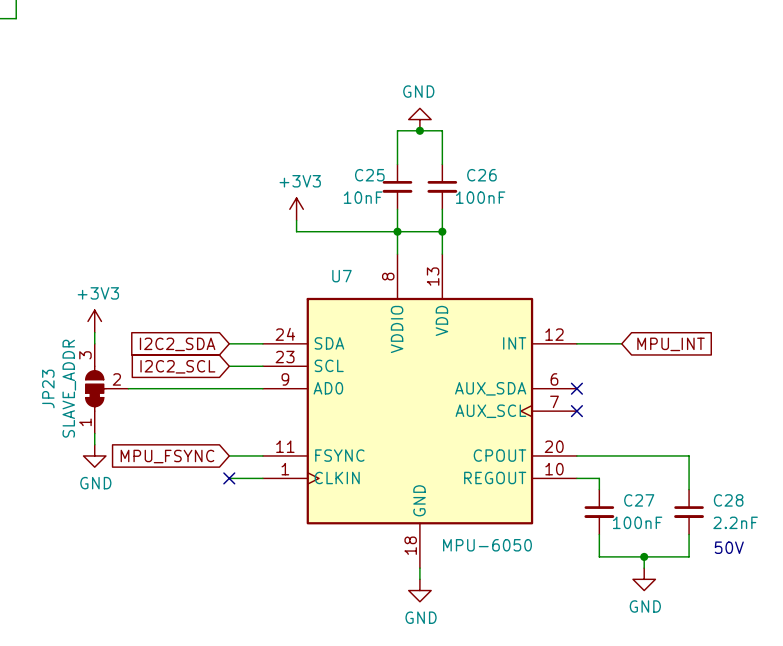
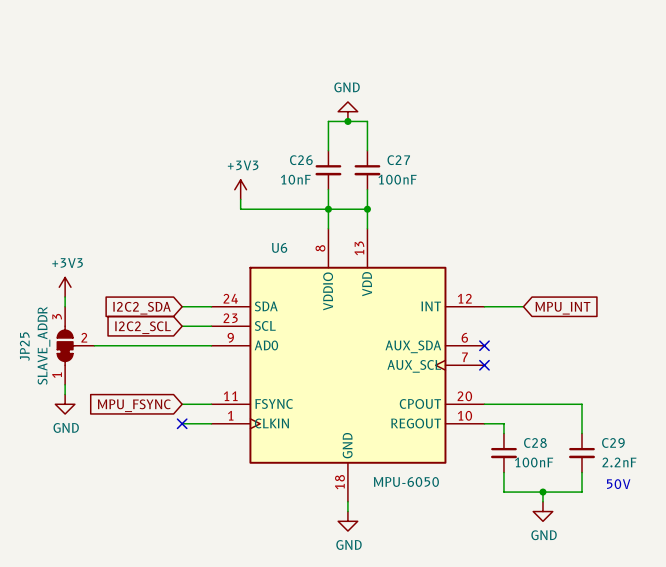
C25 name: C25 (369, 175) -> C26 (301, 160)
C26 name: C26 (481, 175) -> C27 (398, 160)
U7 name: U7 (341, 276) -> U6 (279, 247)
JP23 name: JP23 (48, 388) -> JP25 (24, 346)
C27 name: C27 (639, 500) -> C28 (535, 442)
C28 name: C28 (728, 500) -> C29 (613, 442)

